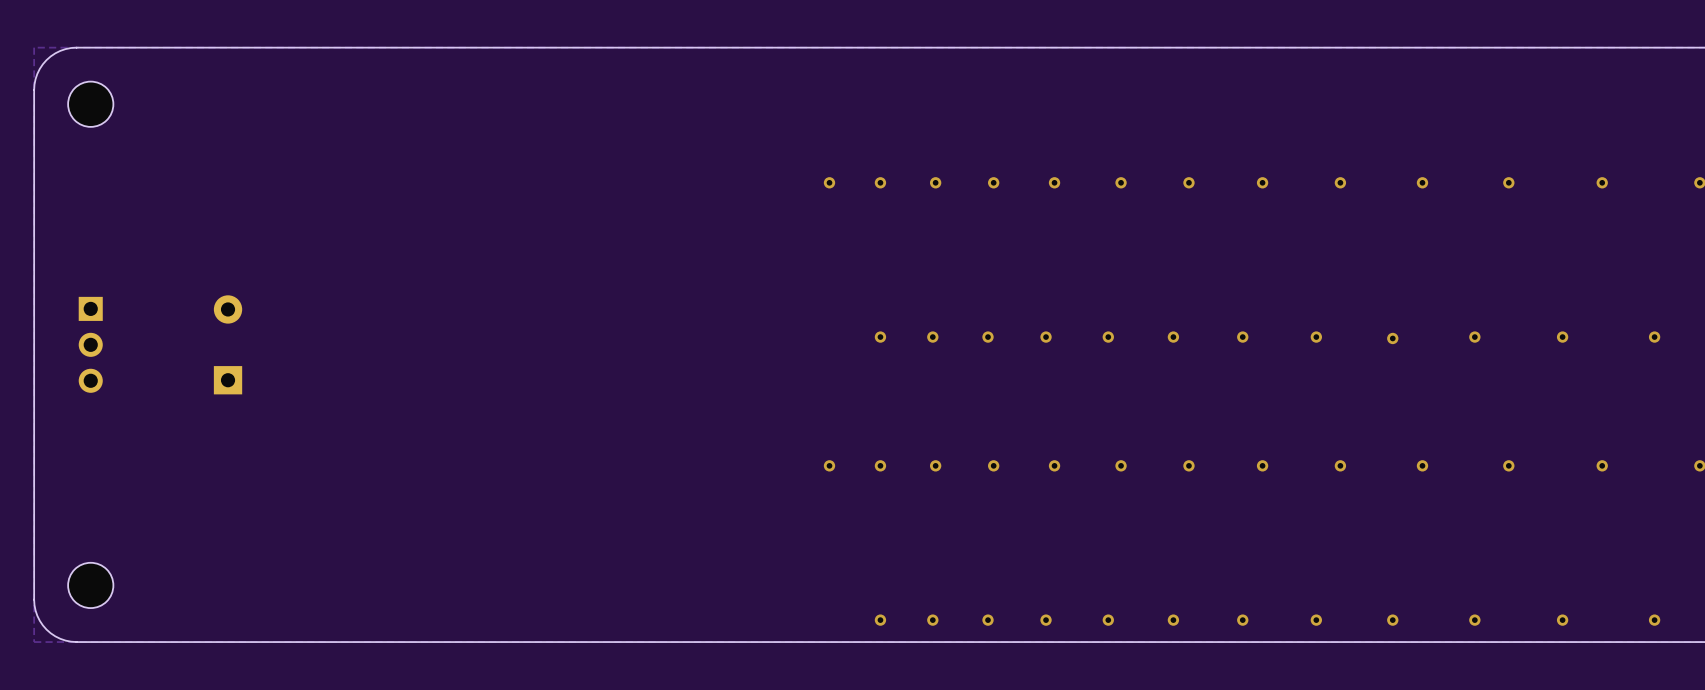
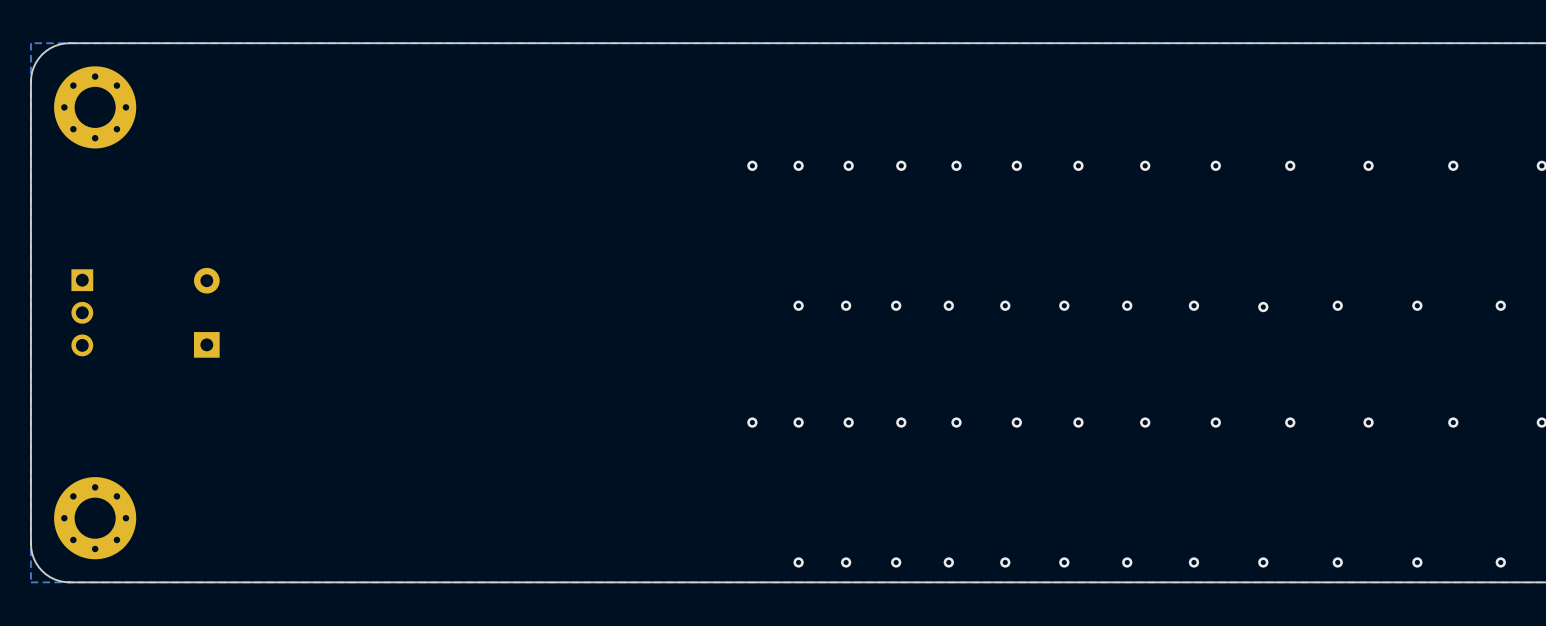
part: (90, 104) -> none
part: none -> (95, 107)
part: none -> (95, 518)
part: (90, 585) -> none

